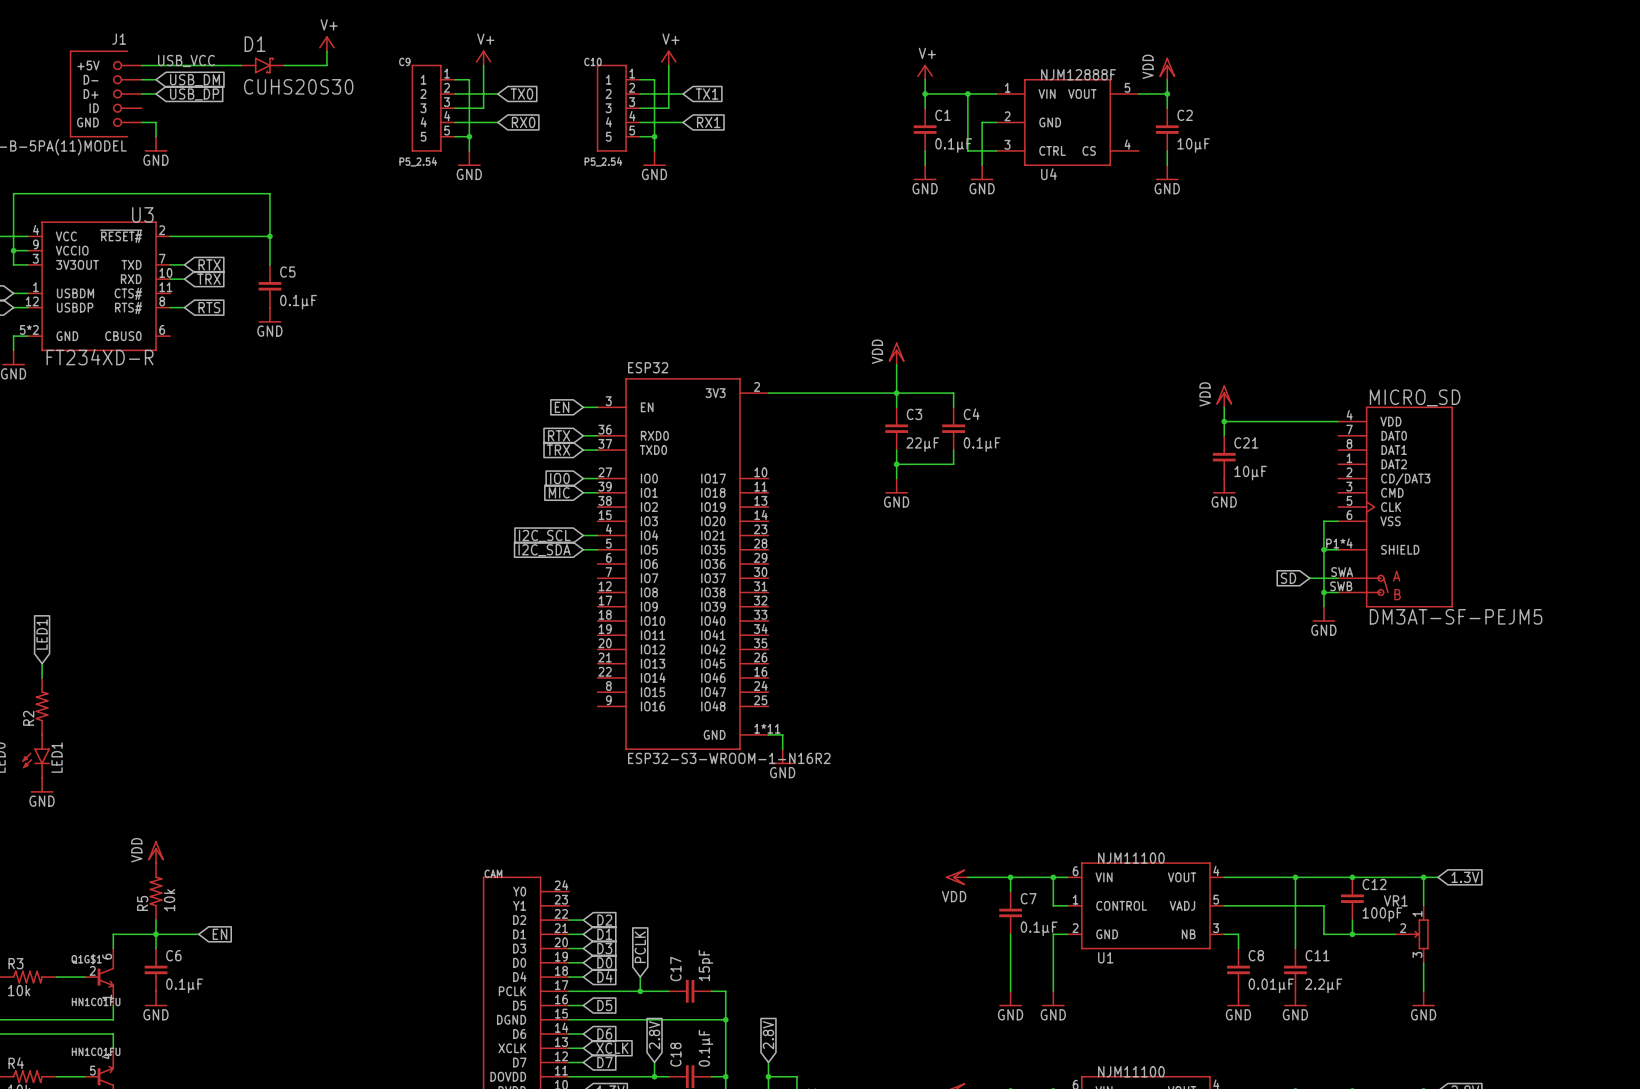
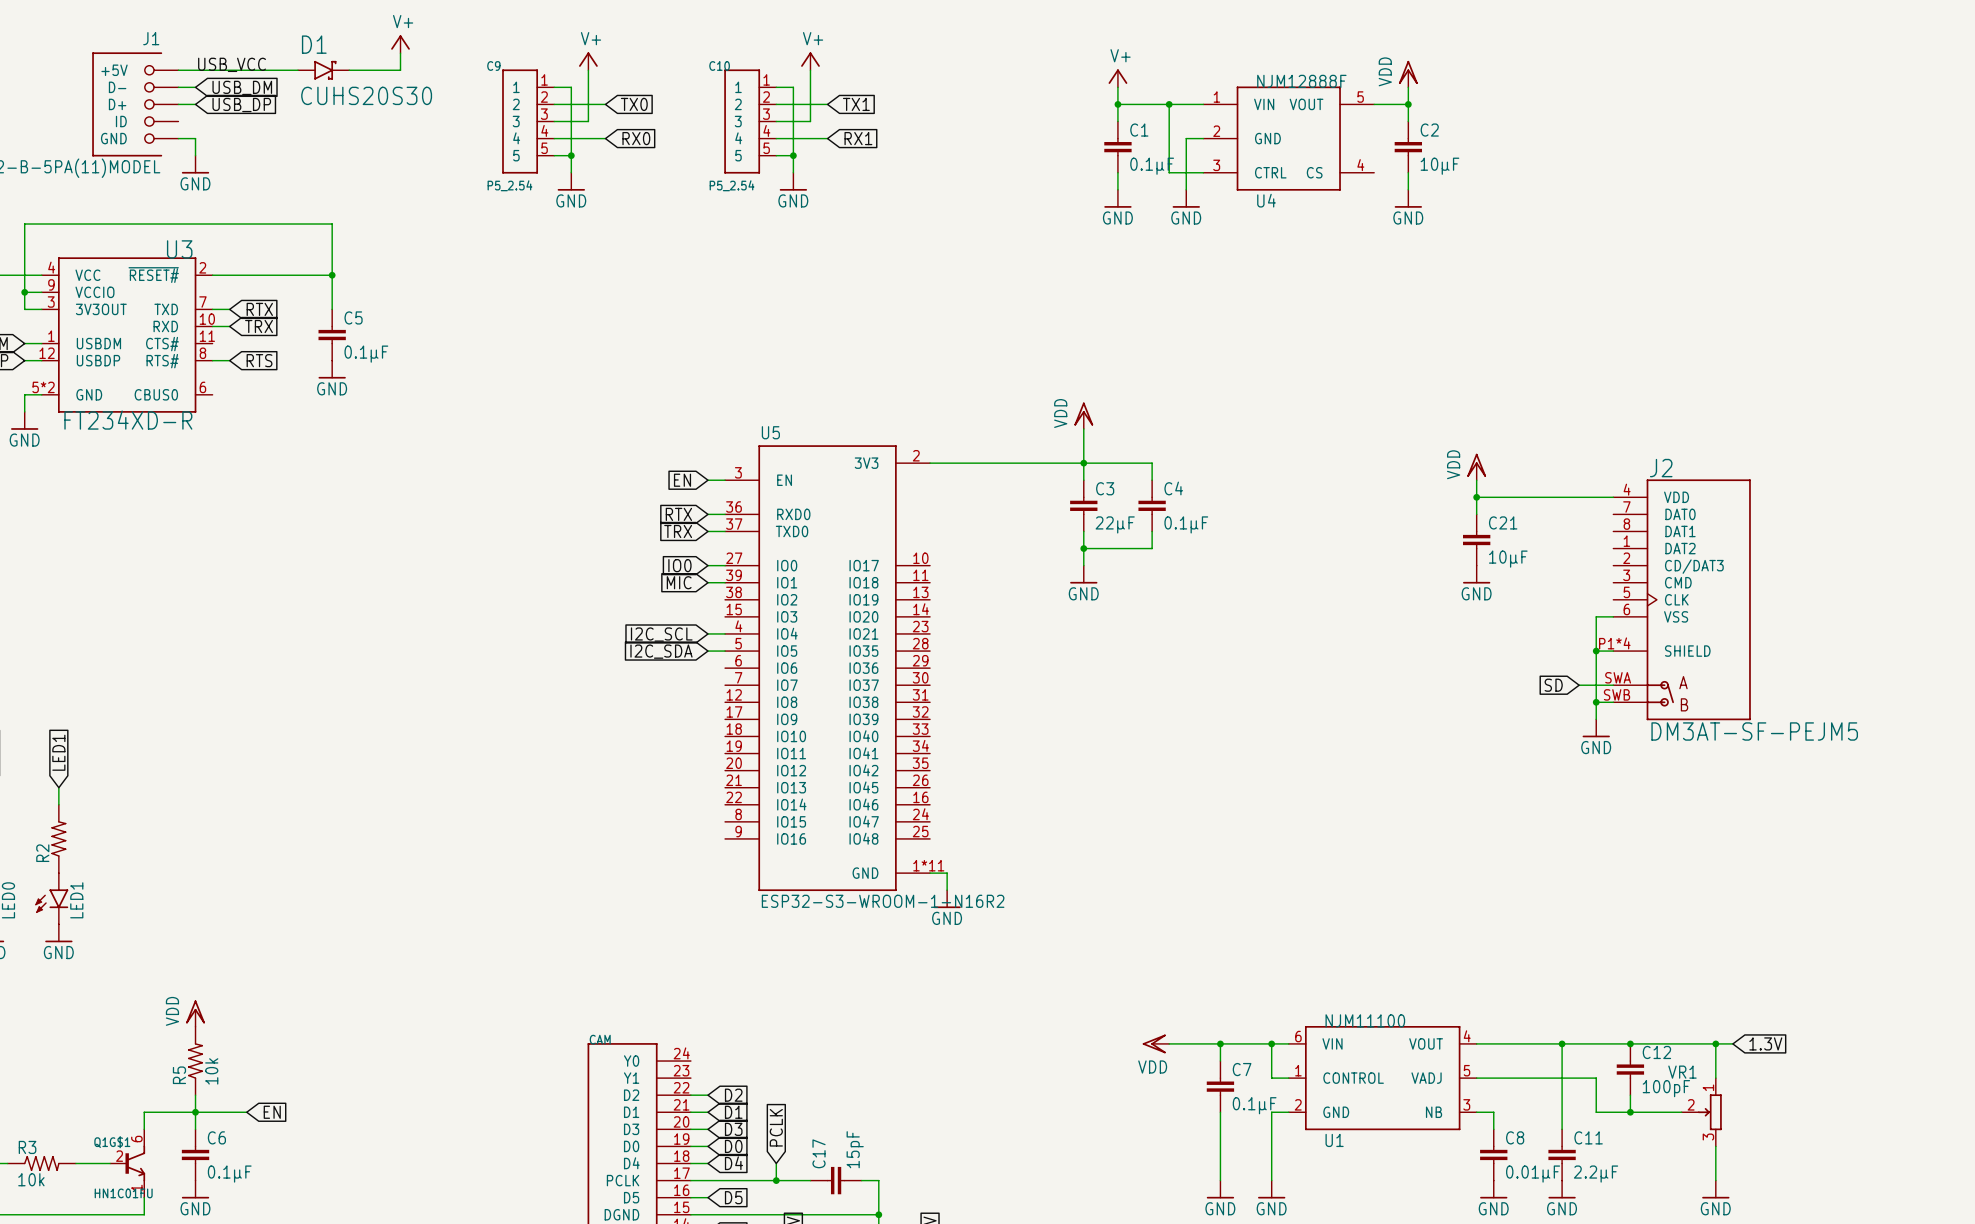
ESP32 name: ESP32 (648, 367) -> U5 (770, 432)
MICRO_SD name: MICRO_SD (1415, 397) -> J2 (1661, 468)

